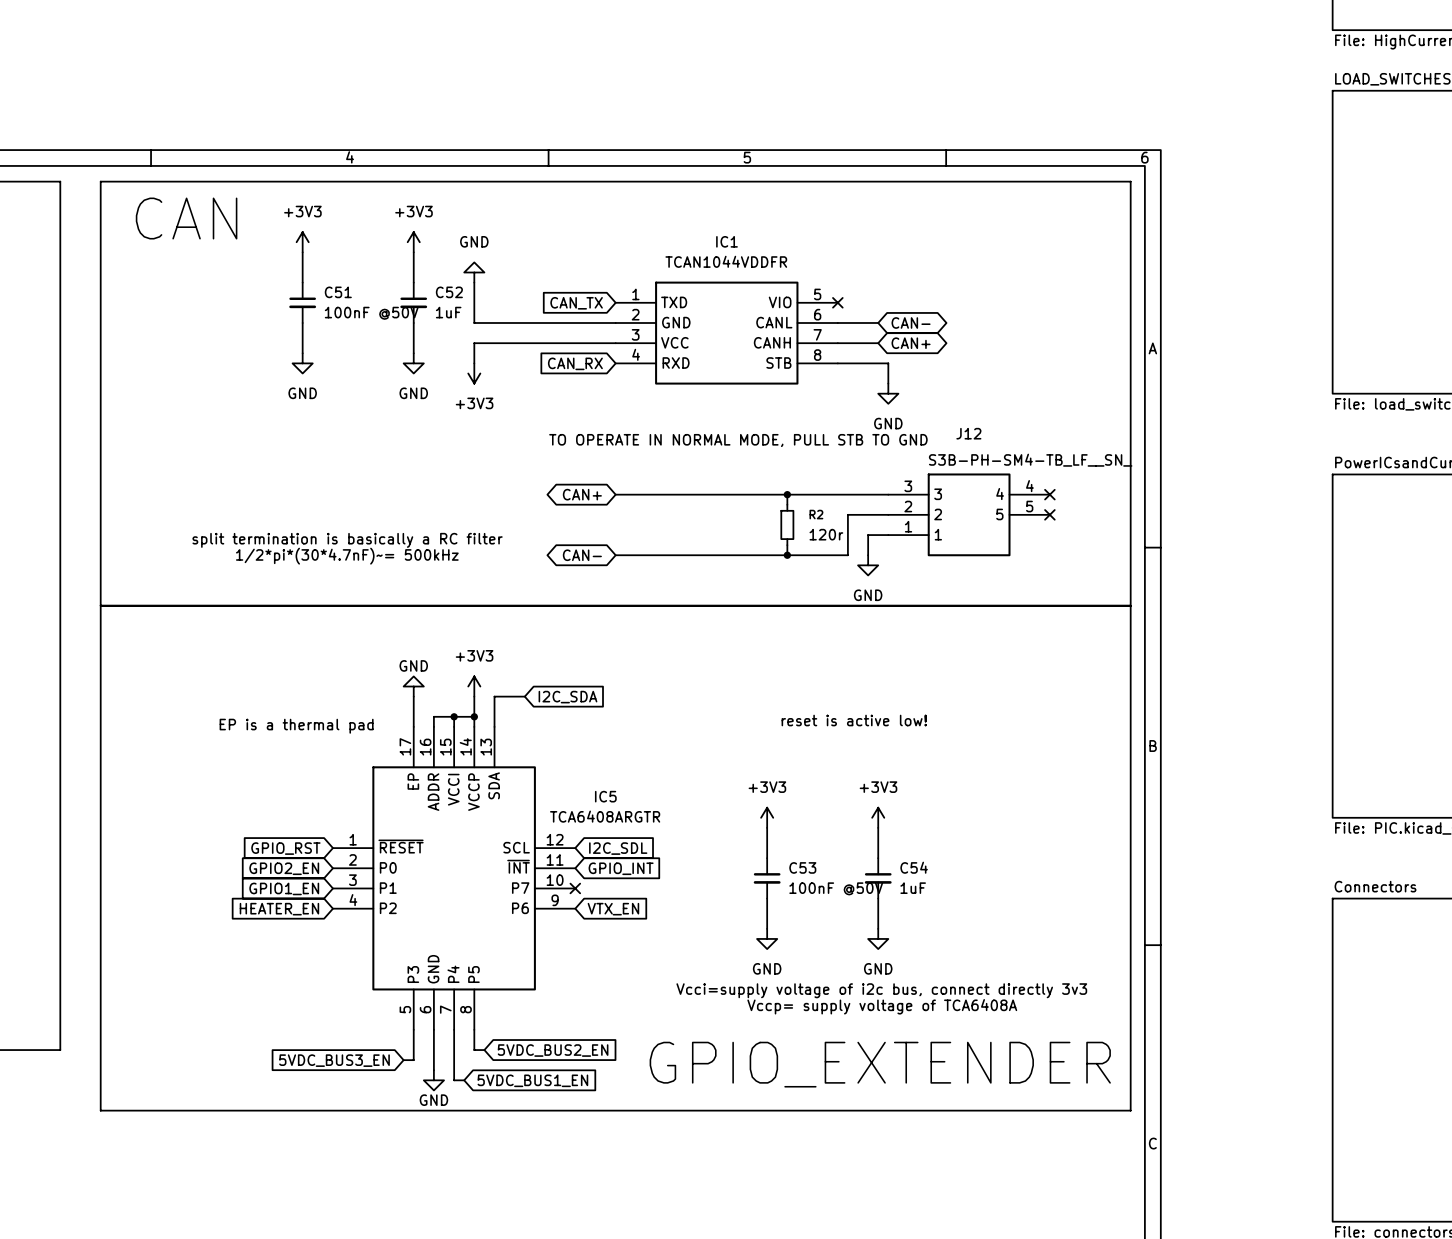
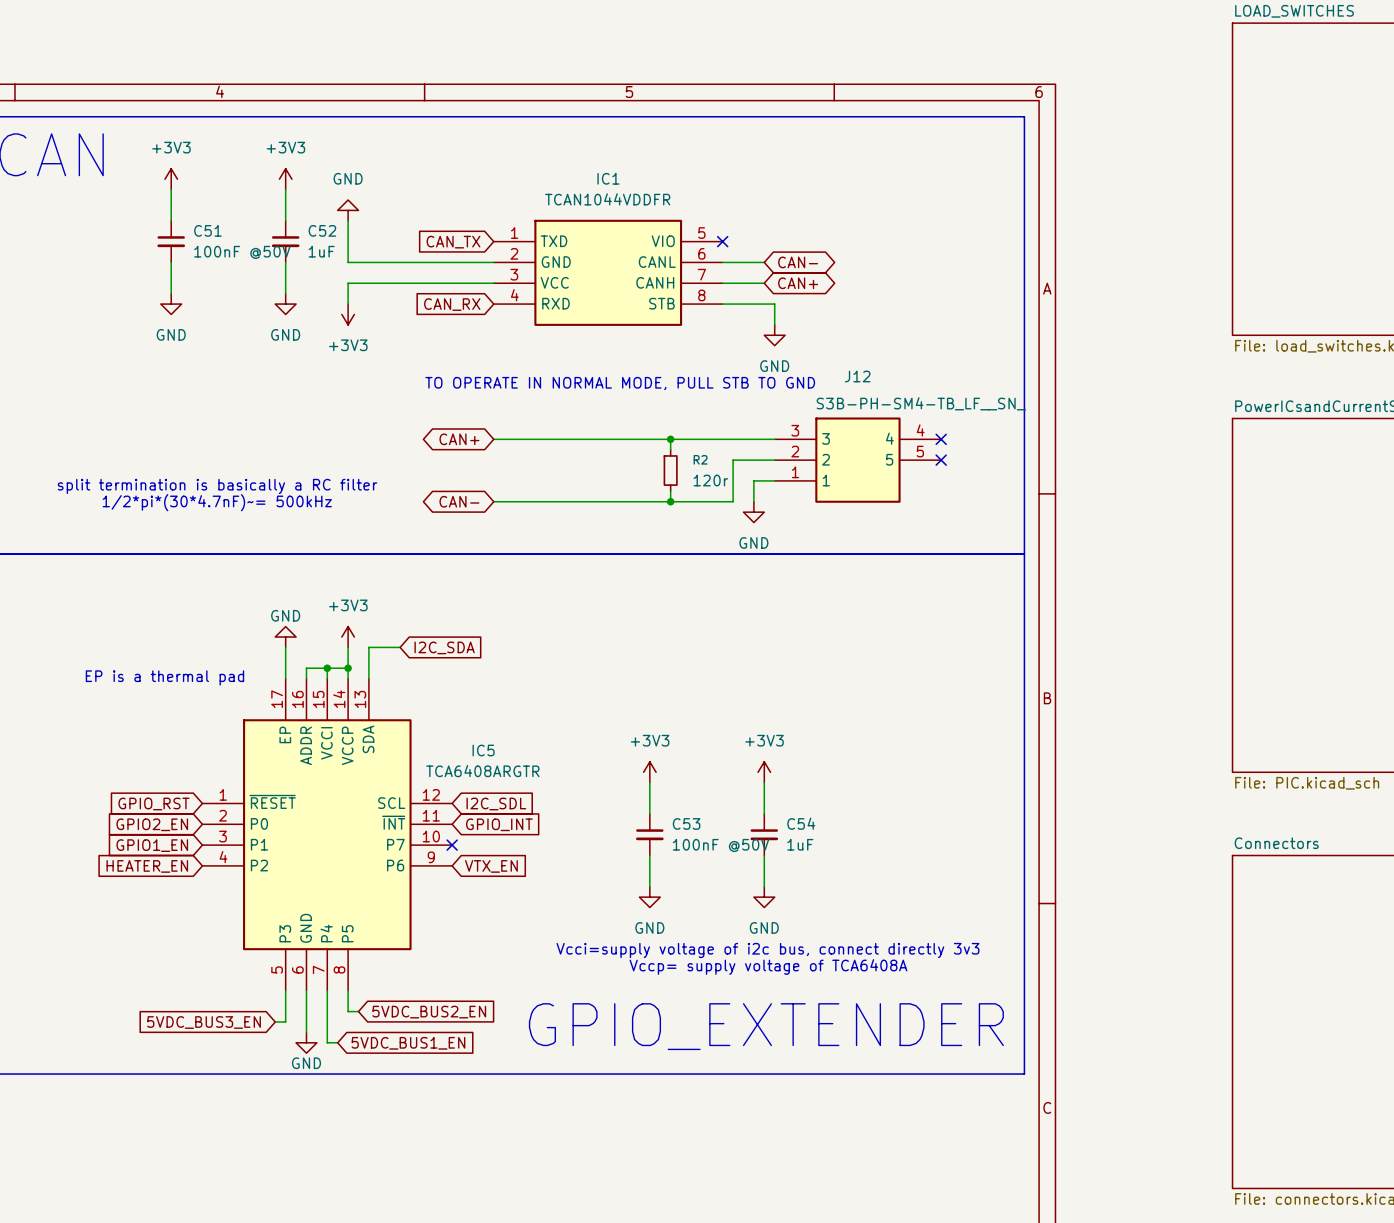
text: reset is active low! (854, 720) -> none

